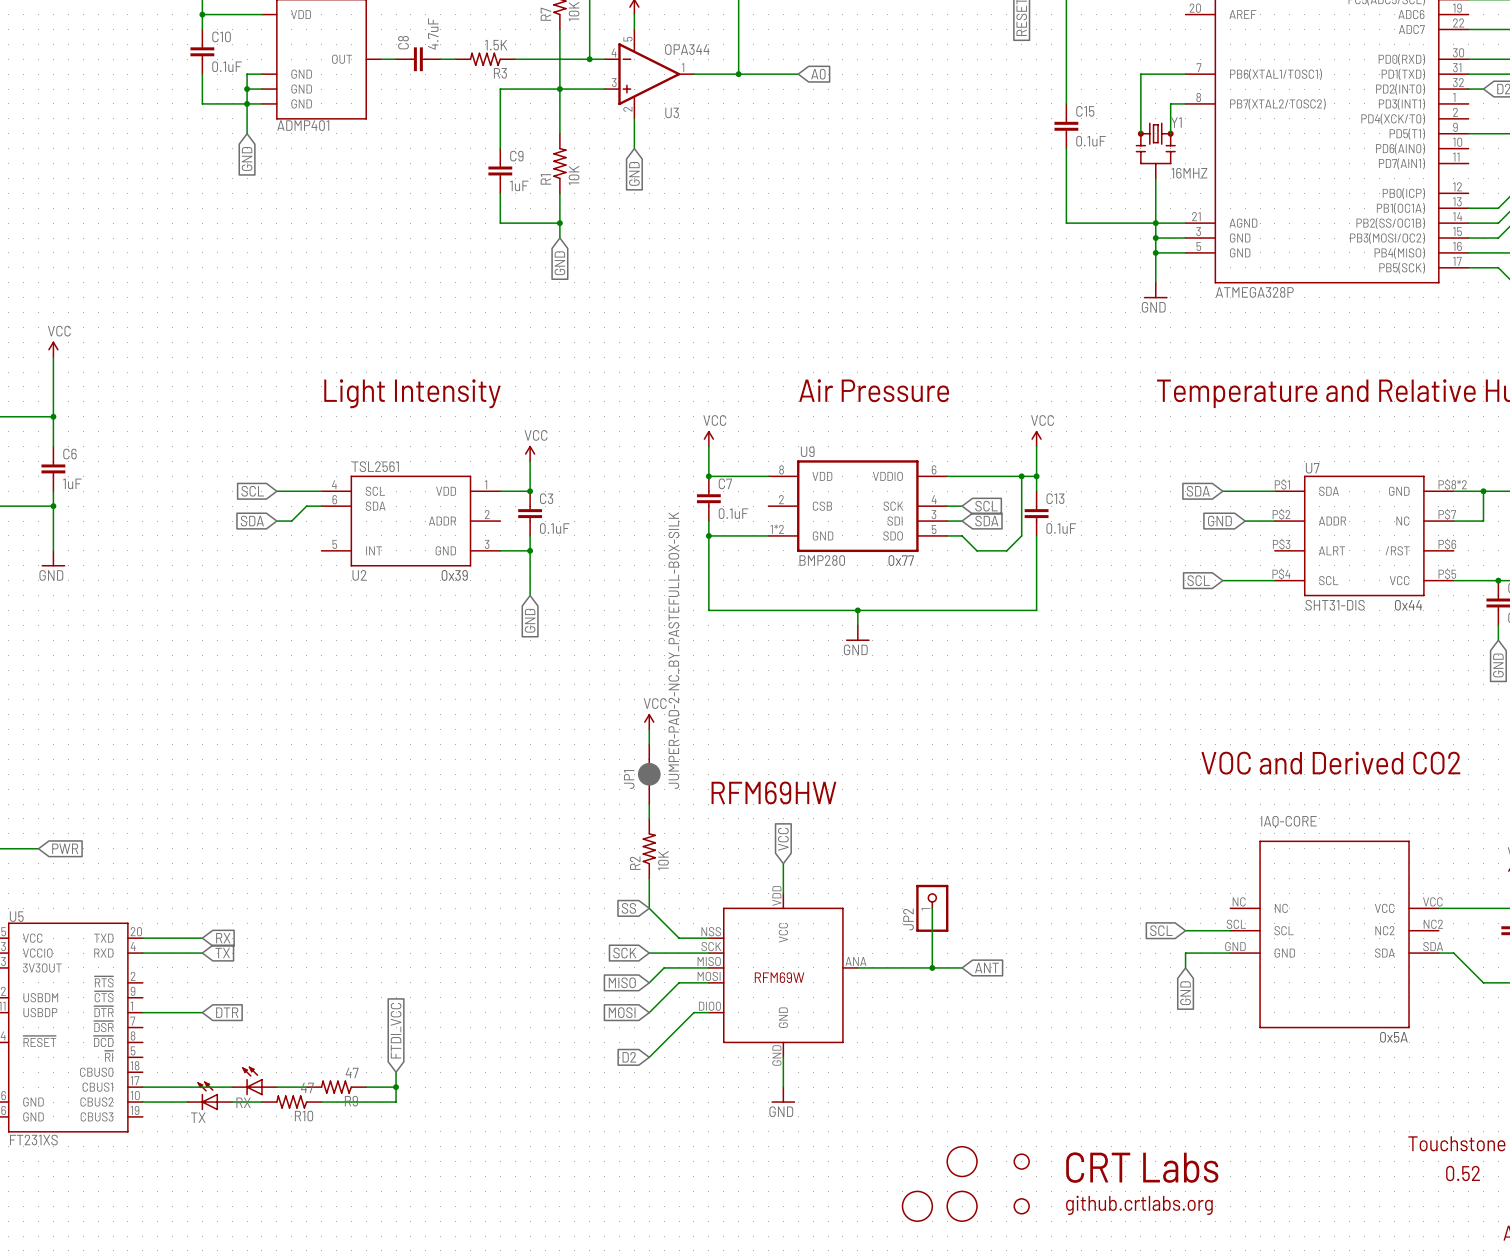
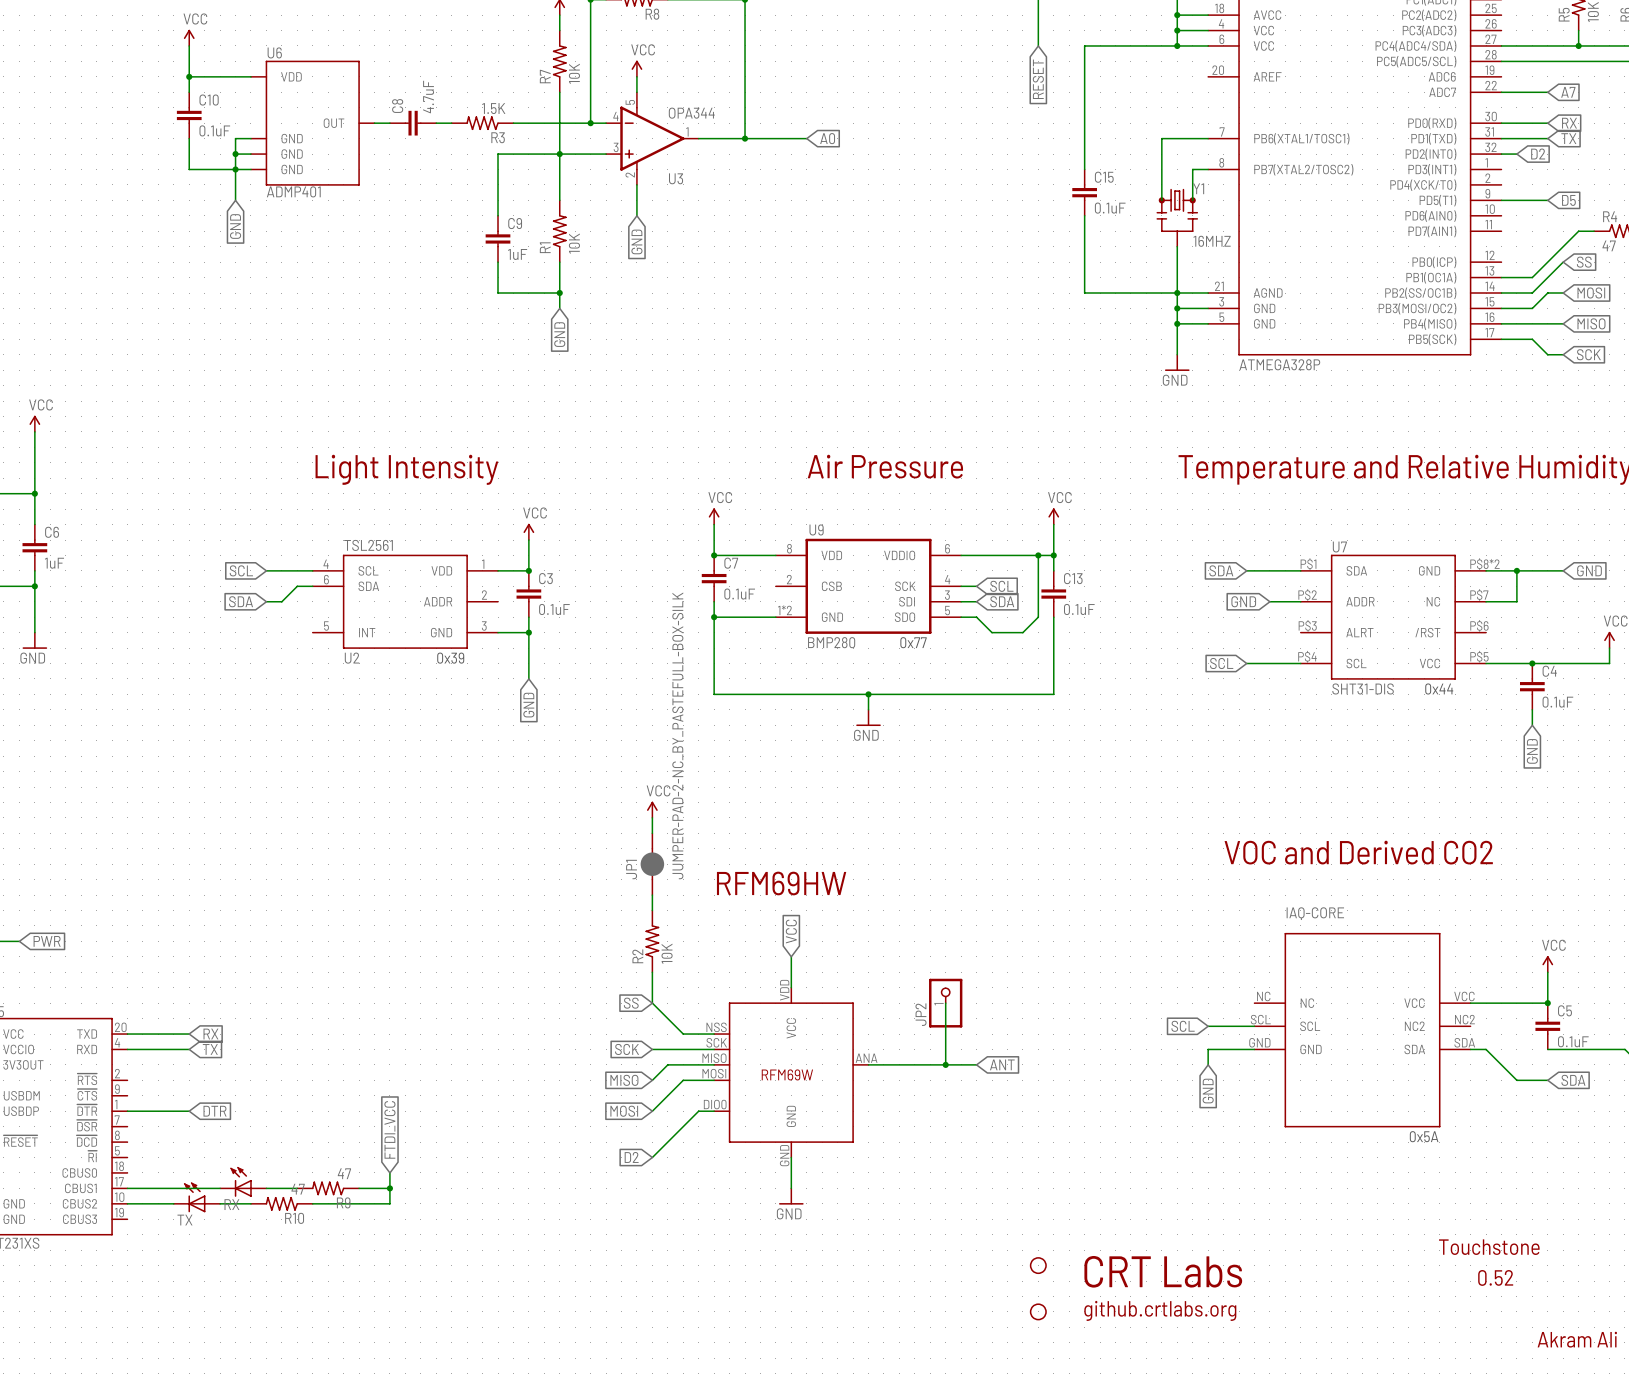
part: (962, 1161) -> none
part: (917, 1206) -> none
part: (962, 1206) -> none

